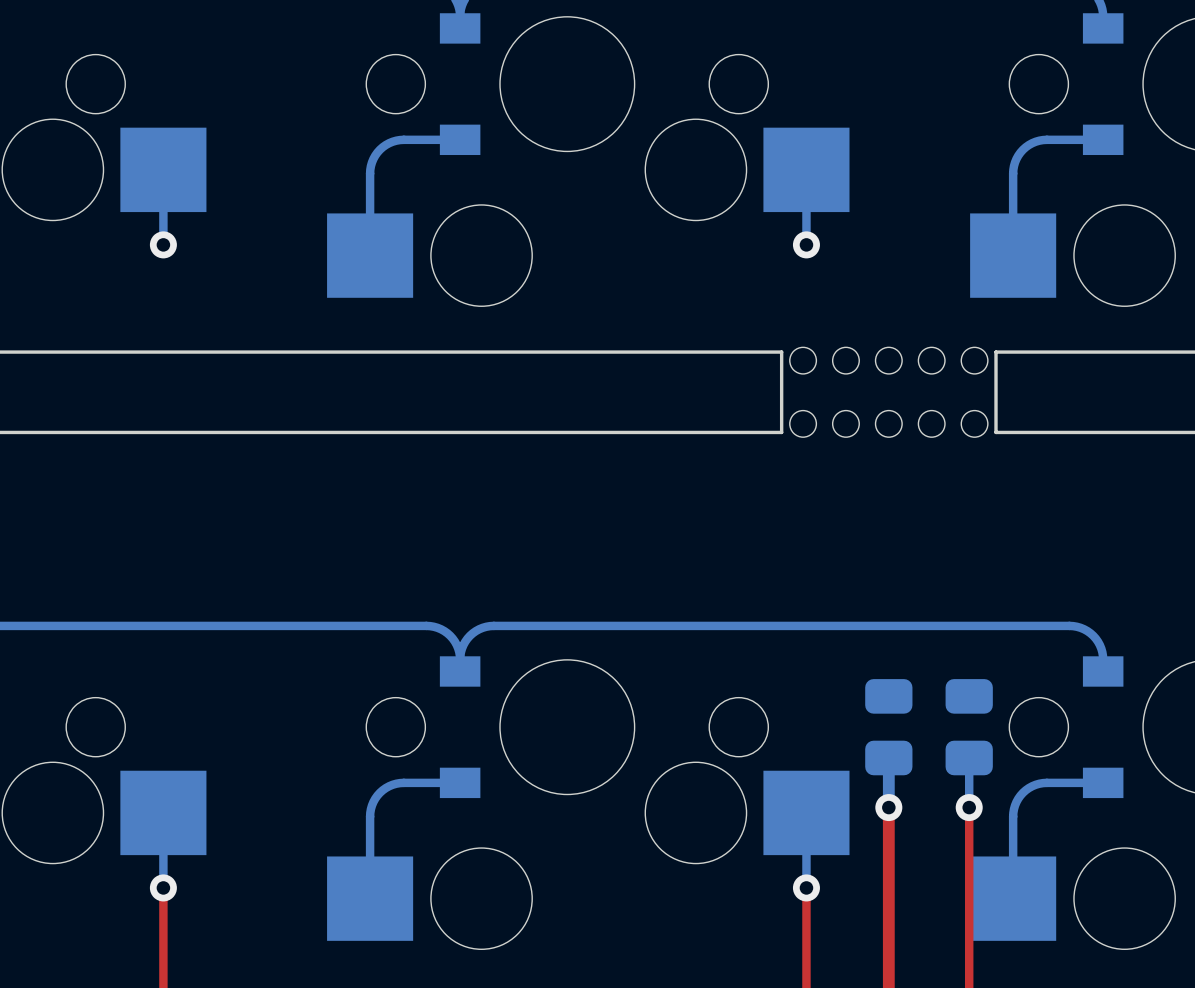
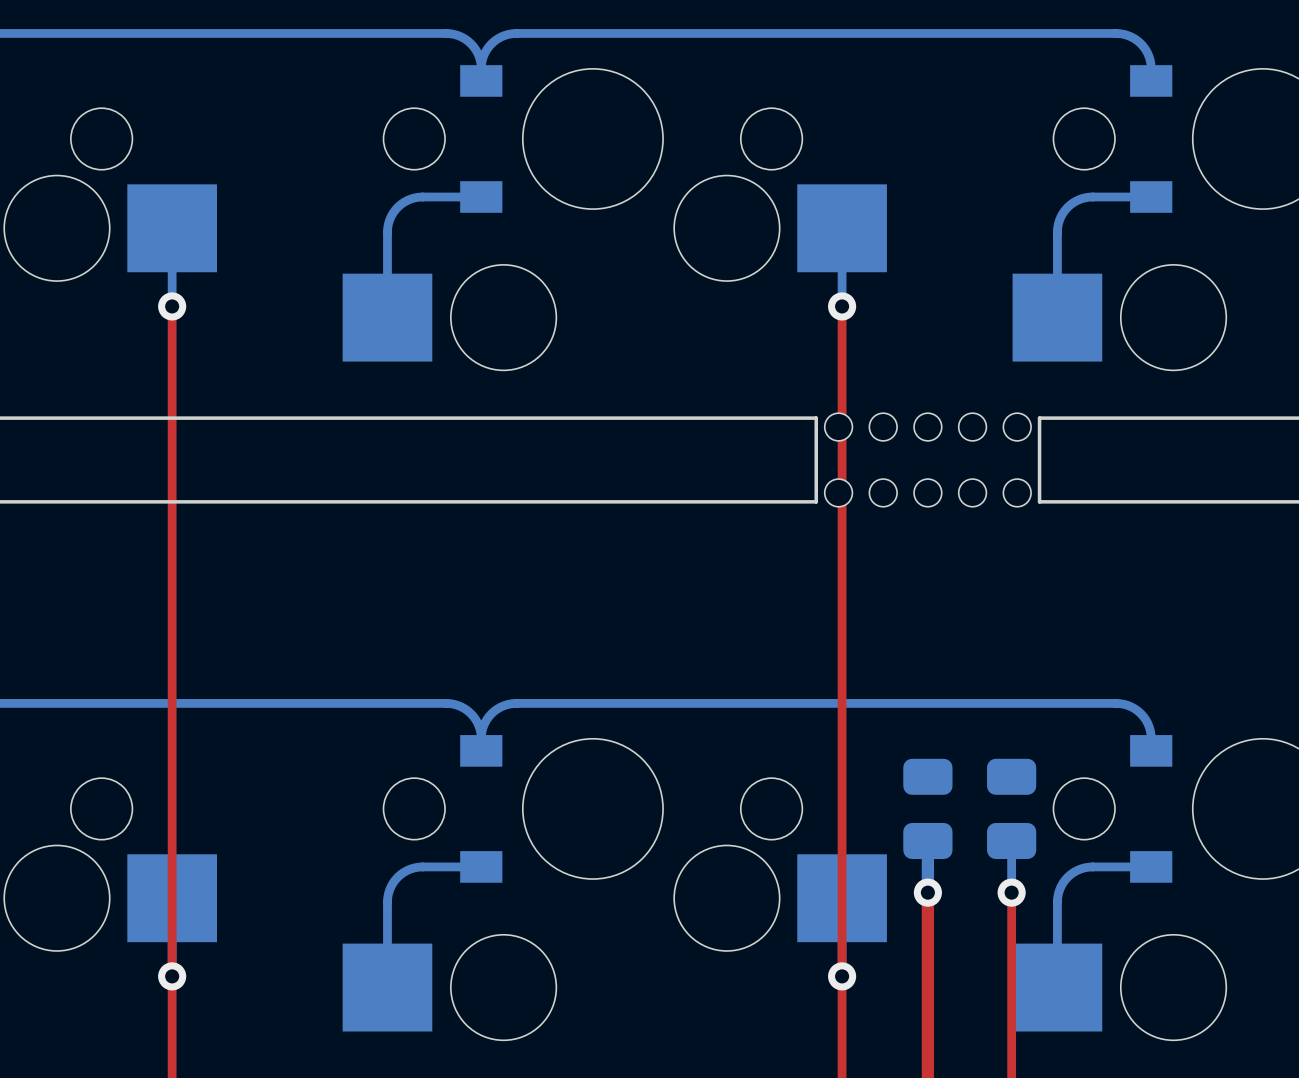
top track: none -> (172, 306) (172, 976)
top track: none -> (842, 306) (842, 976)

